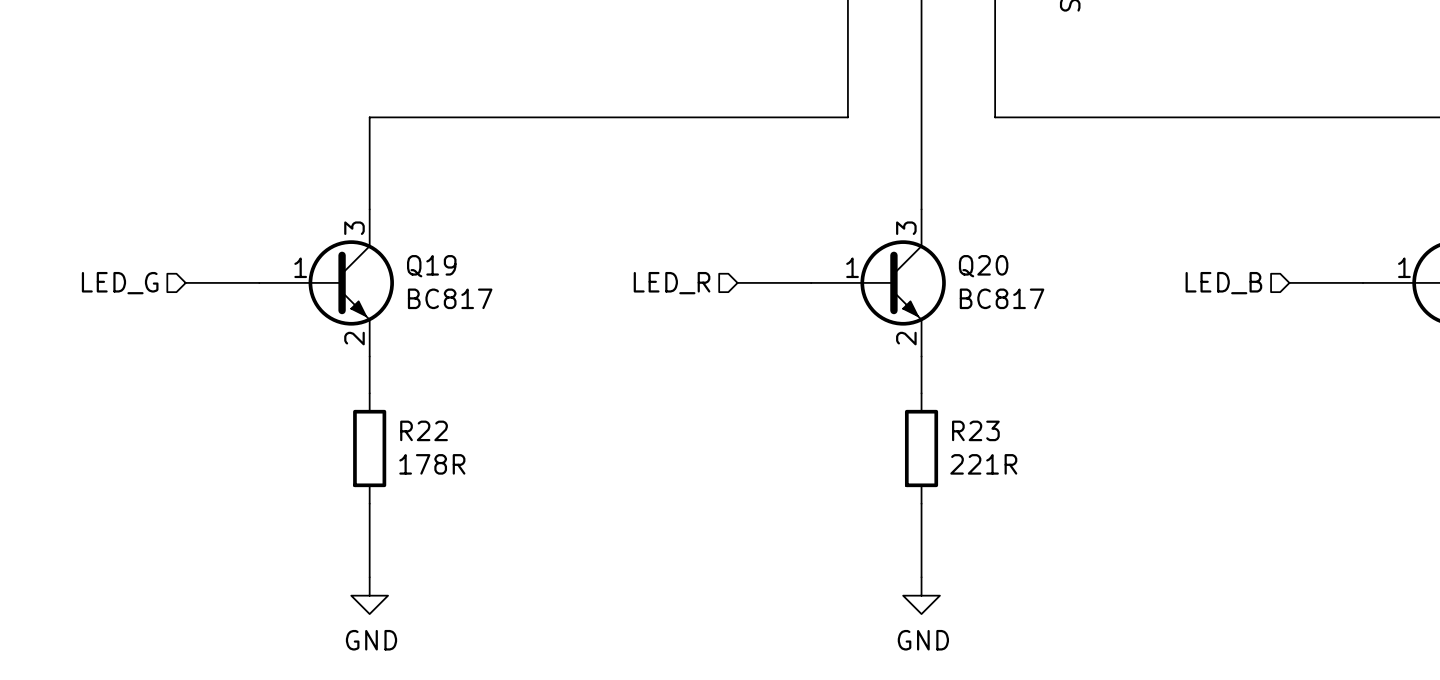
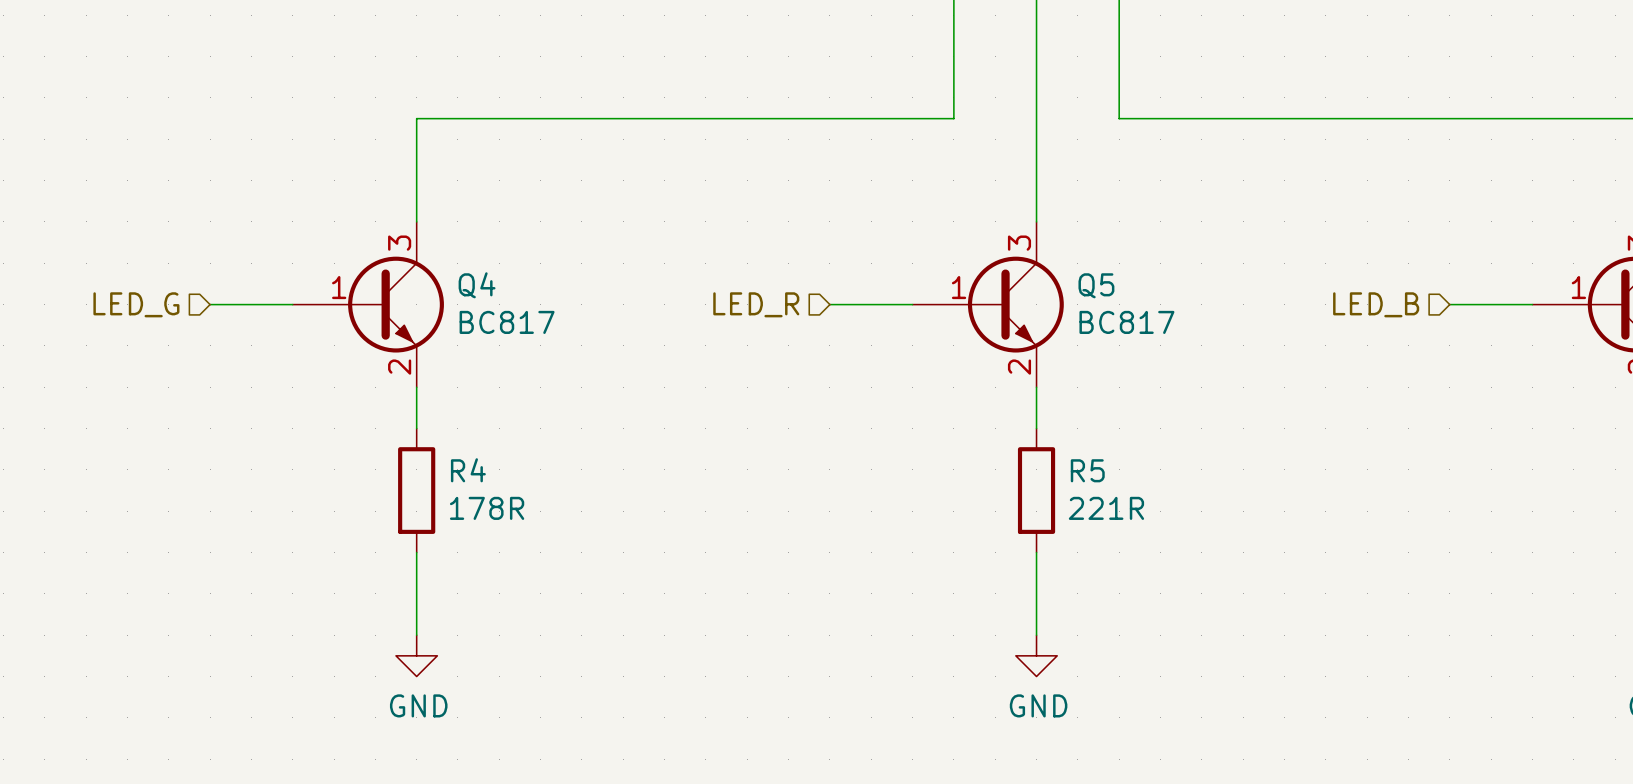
Q19 name: Q19 (431, 266) -> Q4 (477, 285)
Q20 name: Q20 (983, 266) -> Q5 (1096, 285)
R22 name: R22 (424, 430) -> R4 (468, 470)
R23 name: R23 (975, 430) -> R5 (1087, 470)

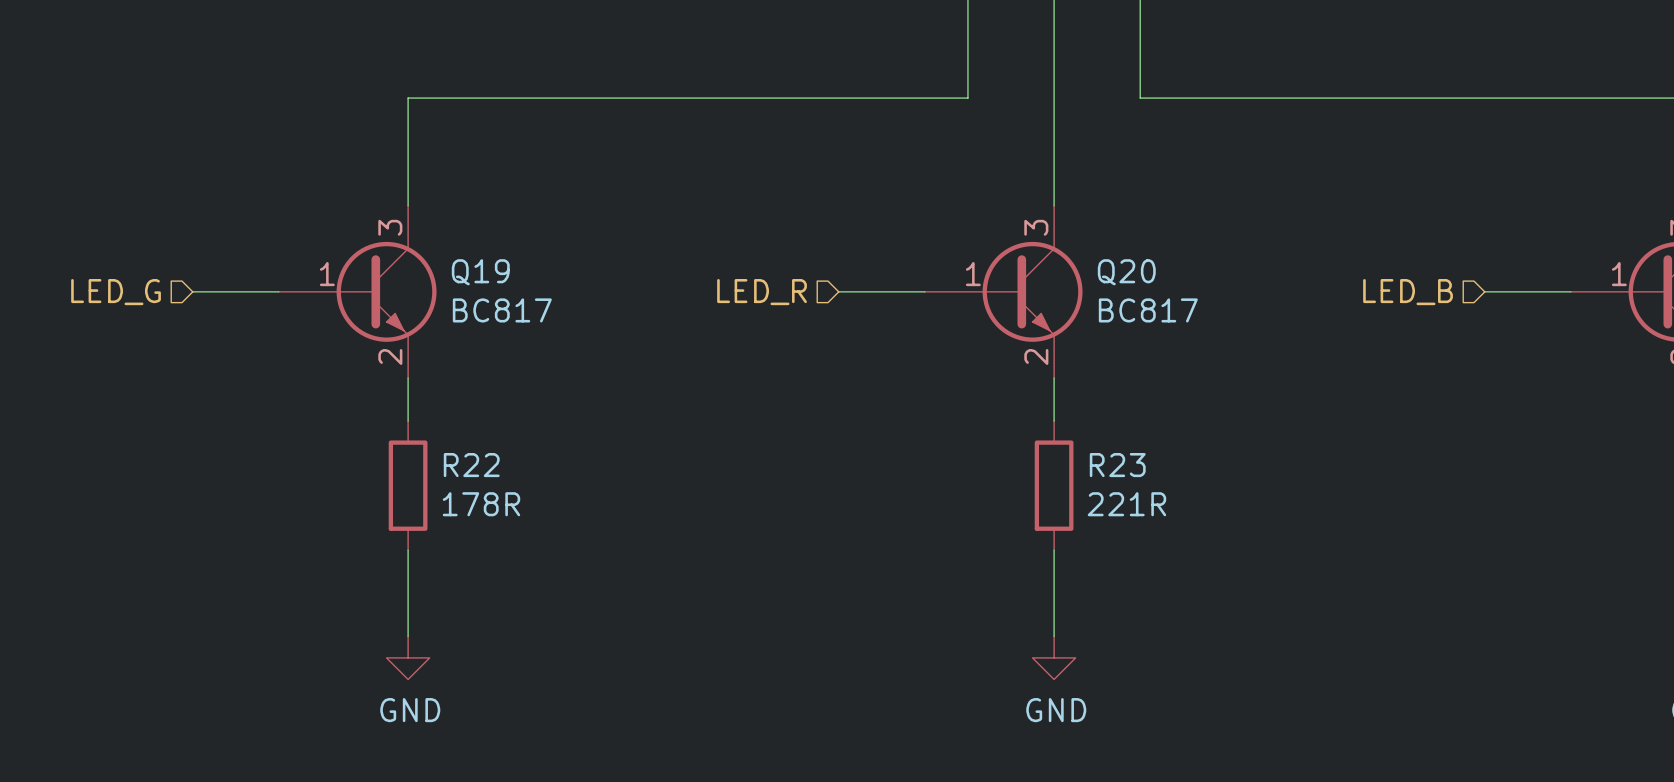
Q4 name: Q4 (477, 285) -> Q19 (480, 272)
Q5 name: Q5 (1096, 285) -> Q20 (1126, 272)
R4 name: R4 (468, 470) -> R22 (471, 465)
R5 name: R5 (1087, 470) -> R23 (1117, 465)

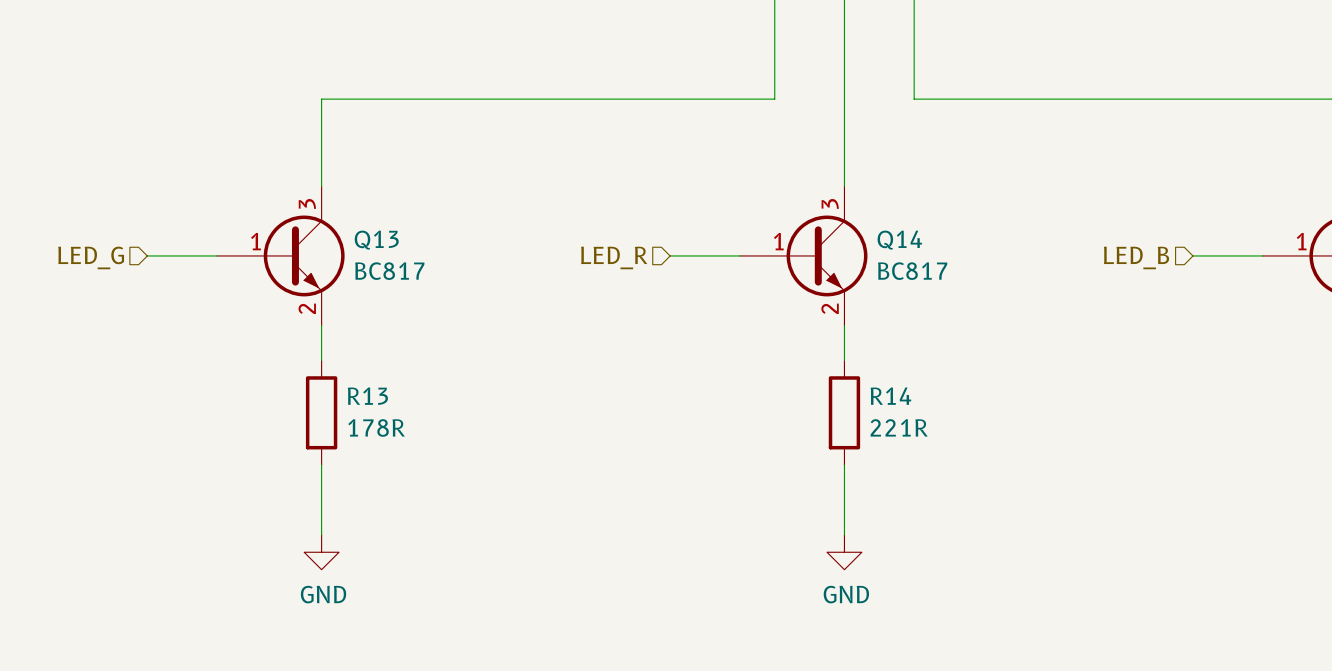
Q19 name: Q19 (480, 272) -> Q13 (376, 240)
Q20 name: Q20 (1126, 272) -> Q14 (899, 240)
R22 name: R22 (471, 465) -> R13 (367, 396)
R23 name: R23 (1117, 465) -> R14 (890, 396)

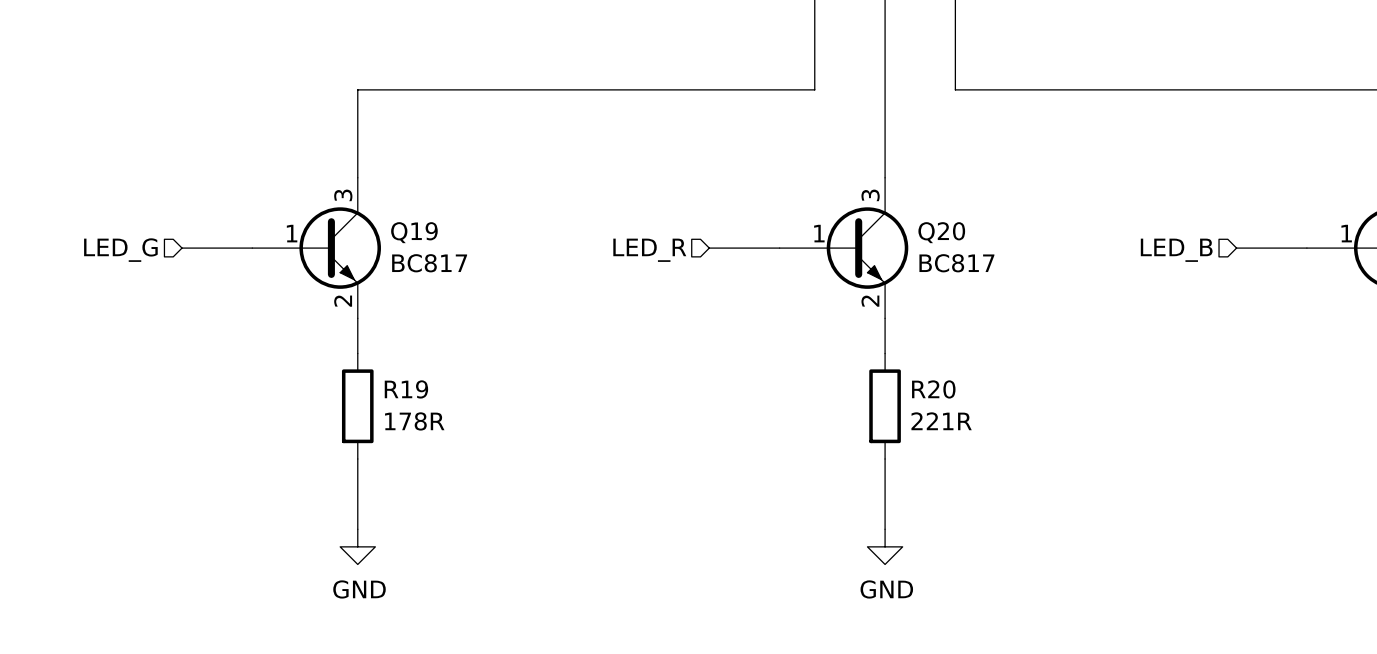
Q13 name: Q13 (376, 240) -> Q19 (414, 232)
Q14 name: Q14 (899, 240) -> Q20 (941, 232)
R13 name: R13 (367, 396) -> R19 (406, 389)
R14 name: R14 (890, 396) -> R20 (933, 389)

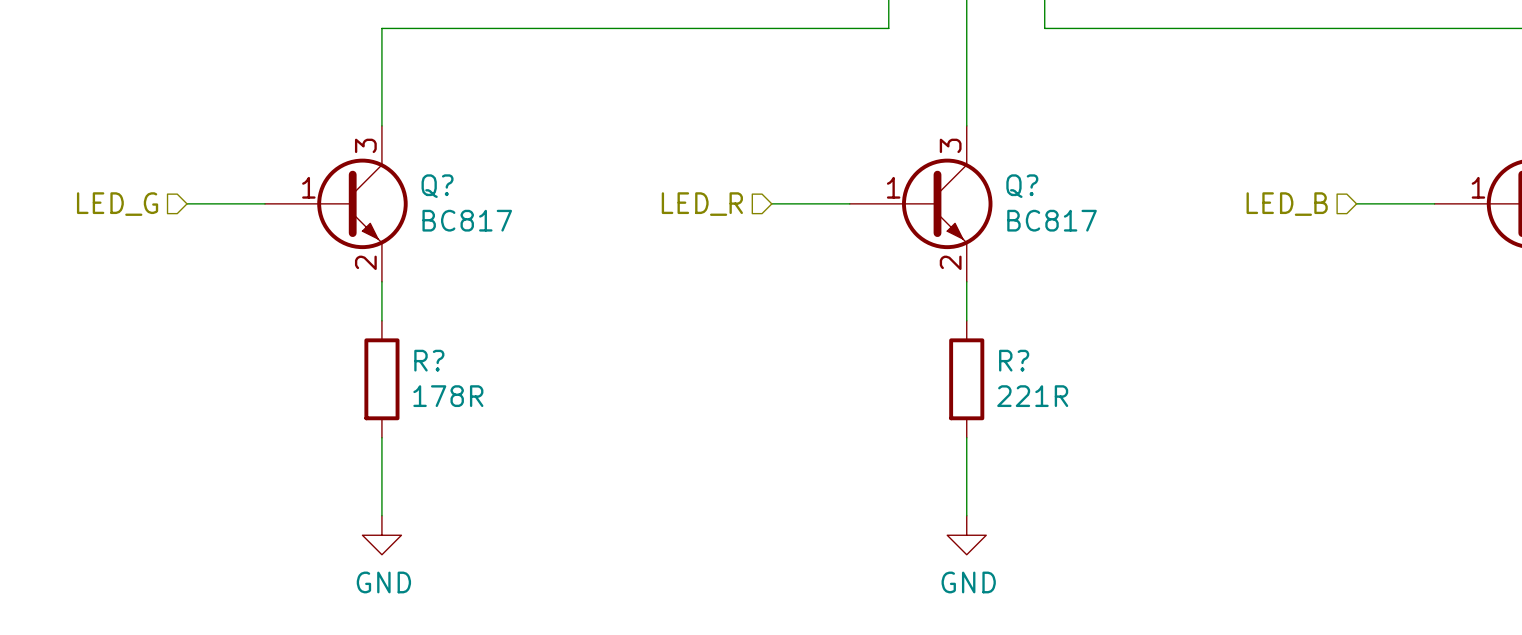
Q19 name: Q19 (414, 232) -> Q? (437, 186)
Q20 name: Q20 (941, 232) -> Q? (1022, 186)
R19 name: R19 (406, 389) -> R? (429, 360)
R20 name: R20 (933, 389) -> R? (1014, 360)

